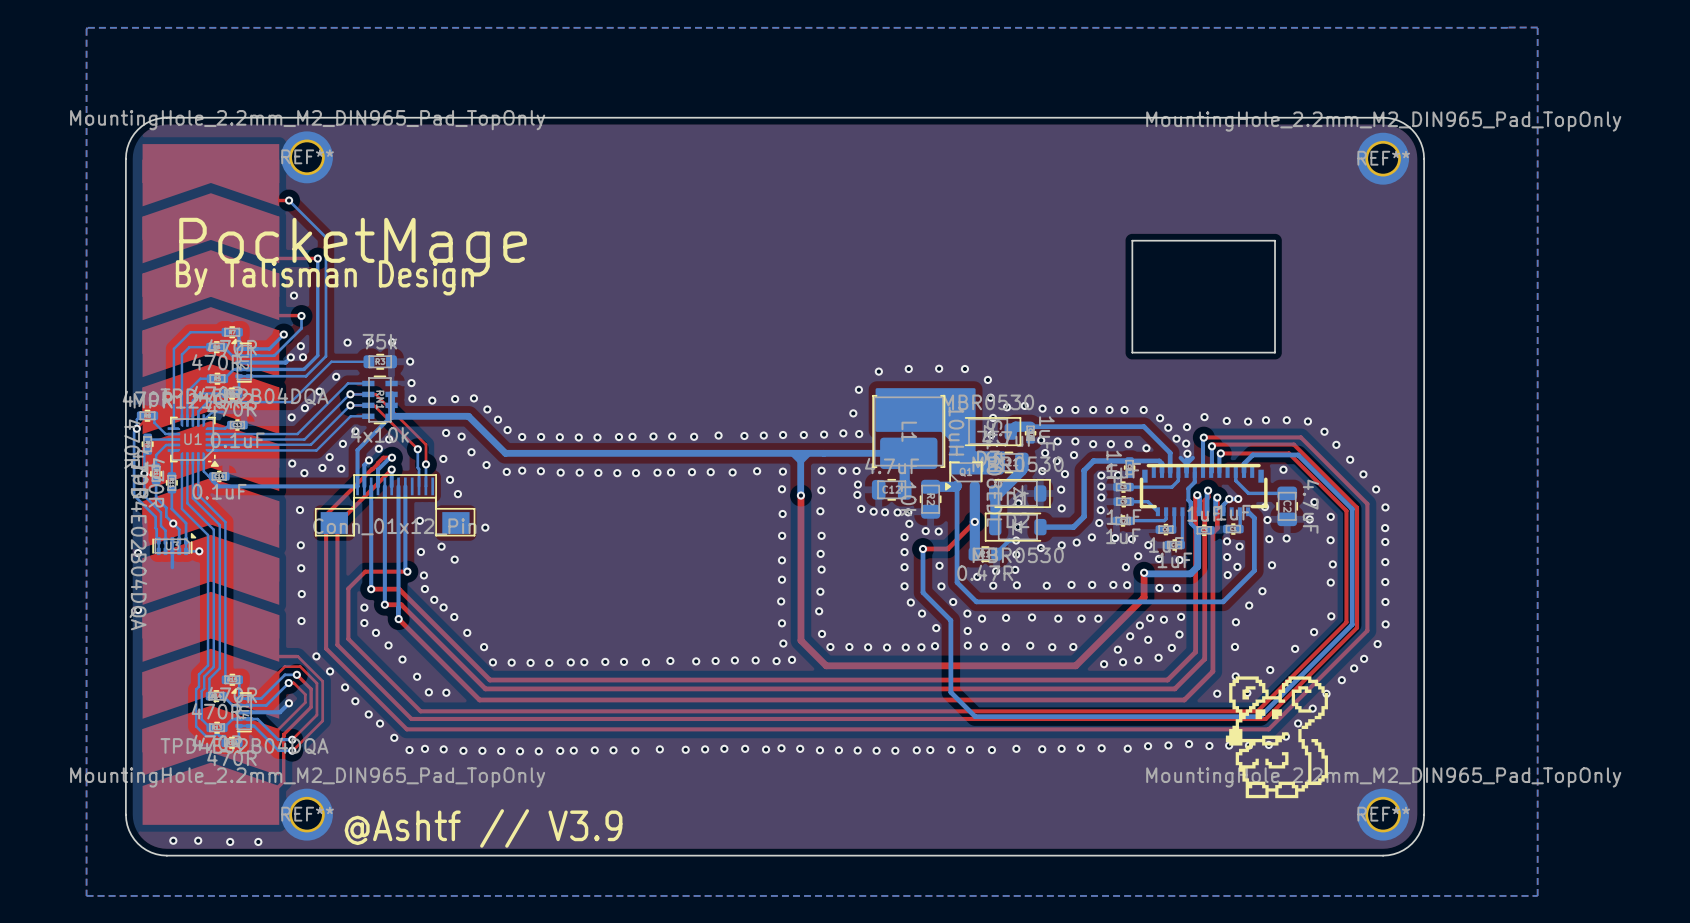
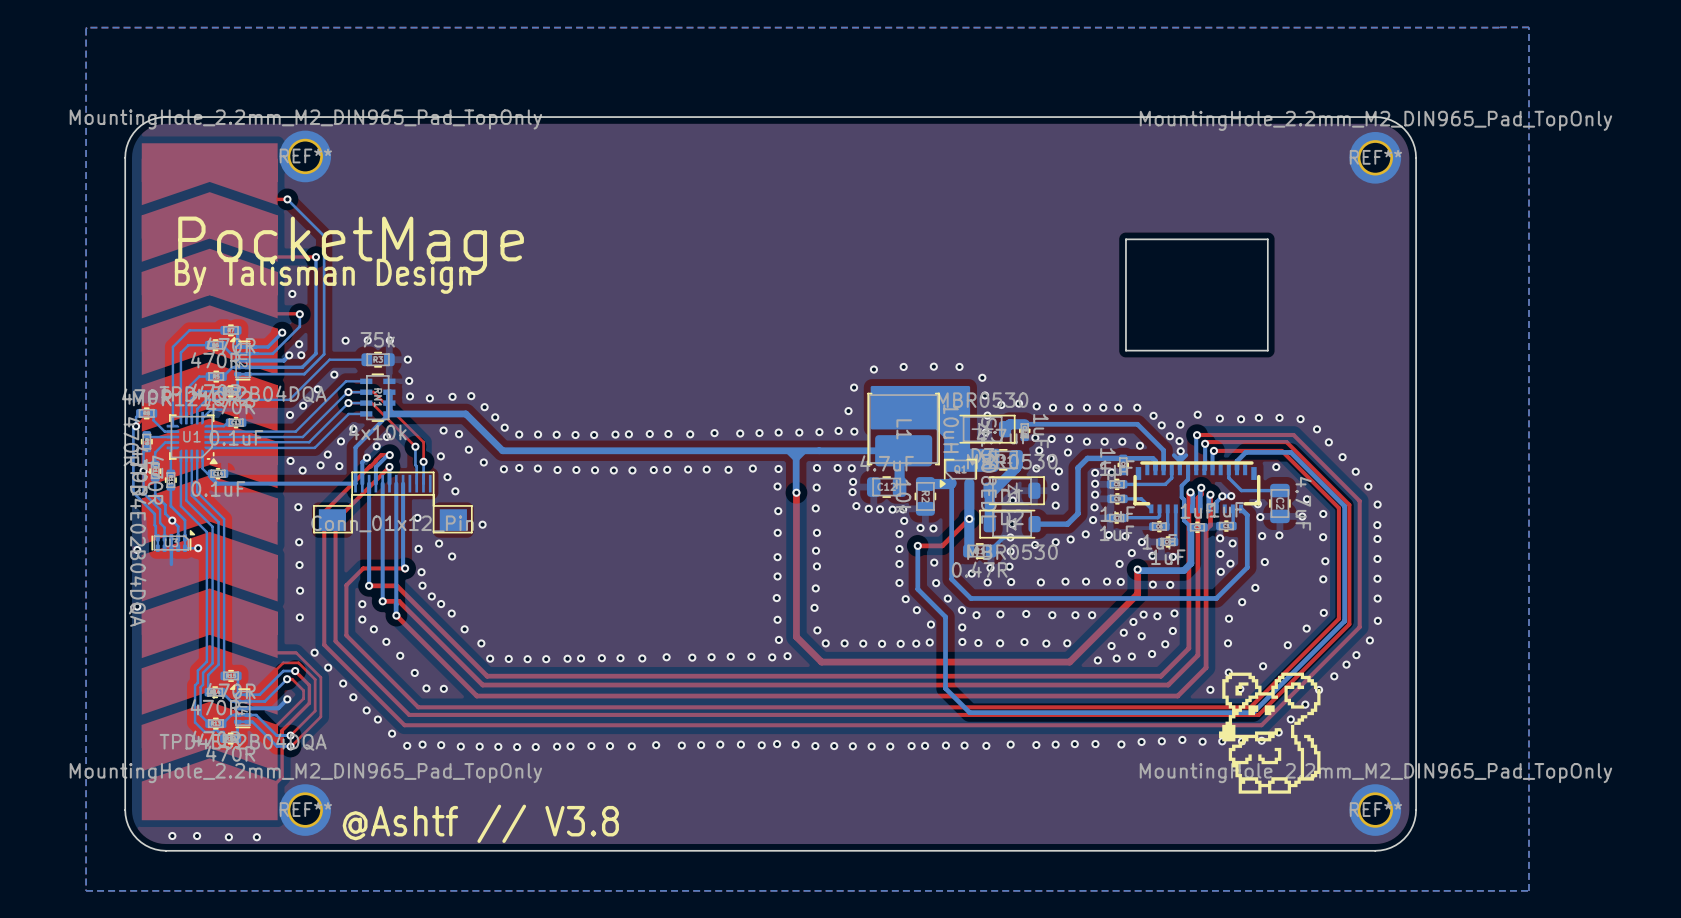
text: @Ashtf // V3.9 (483, 828) -> @Ashtf // V3.8 (480, 823)

